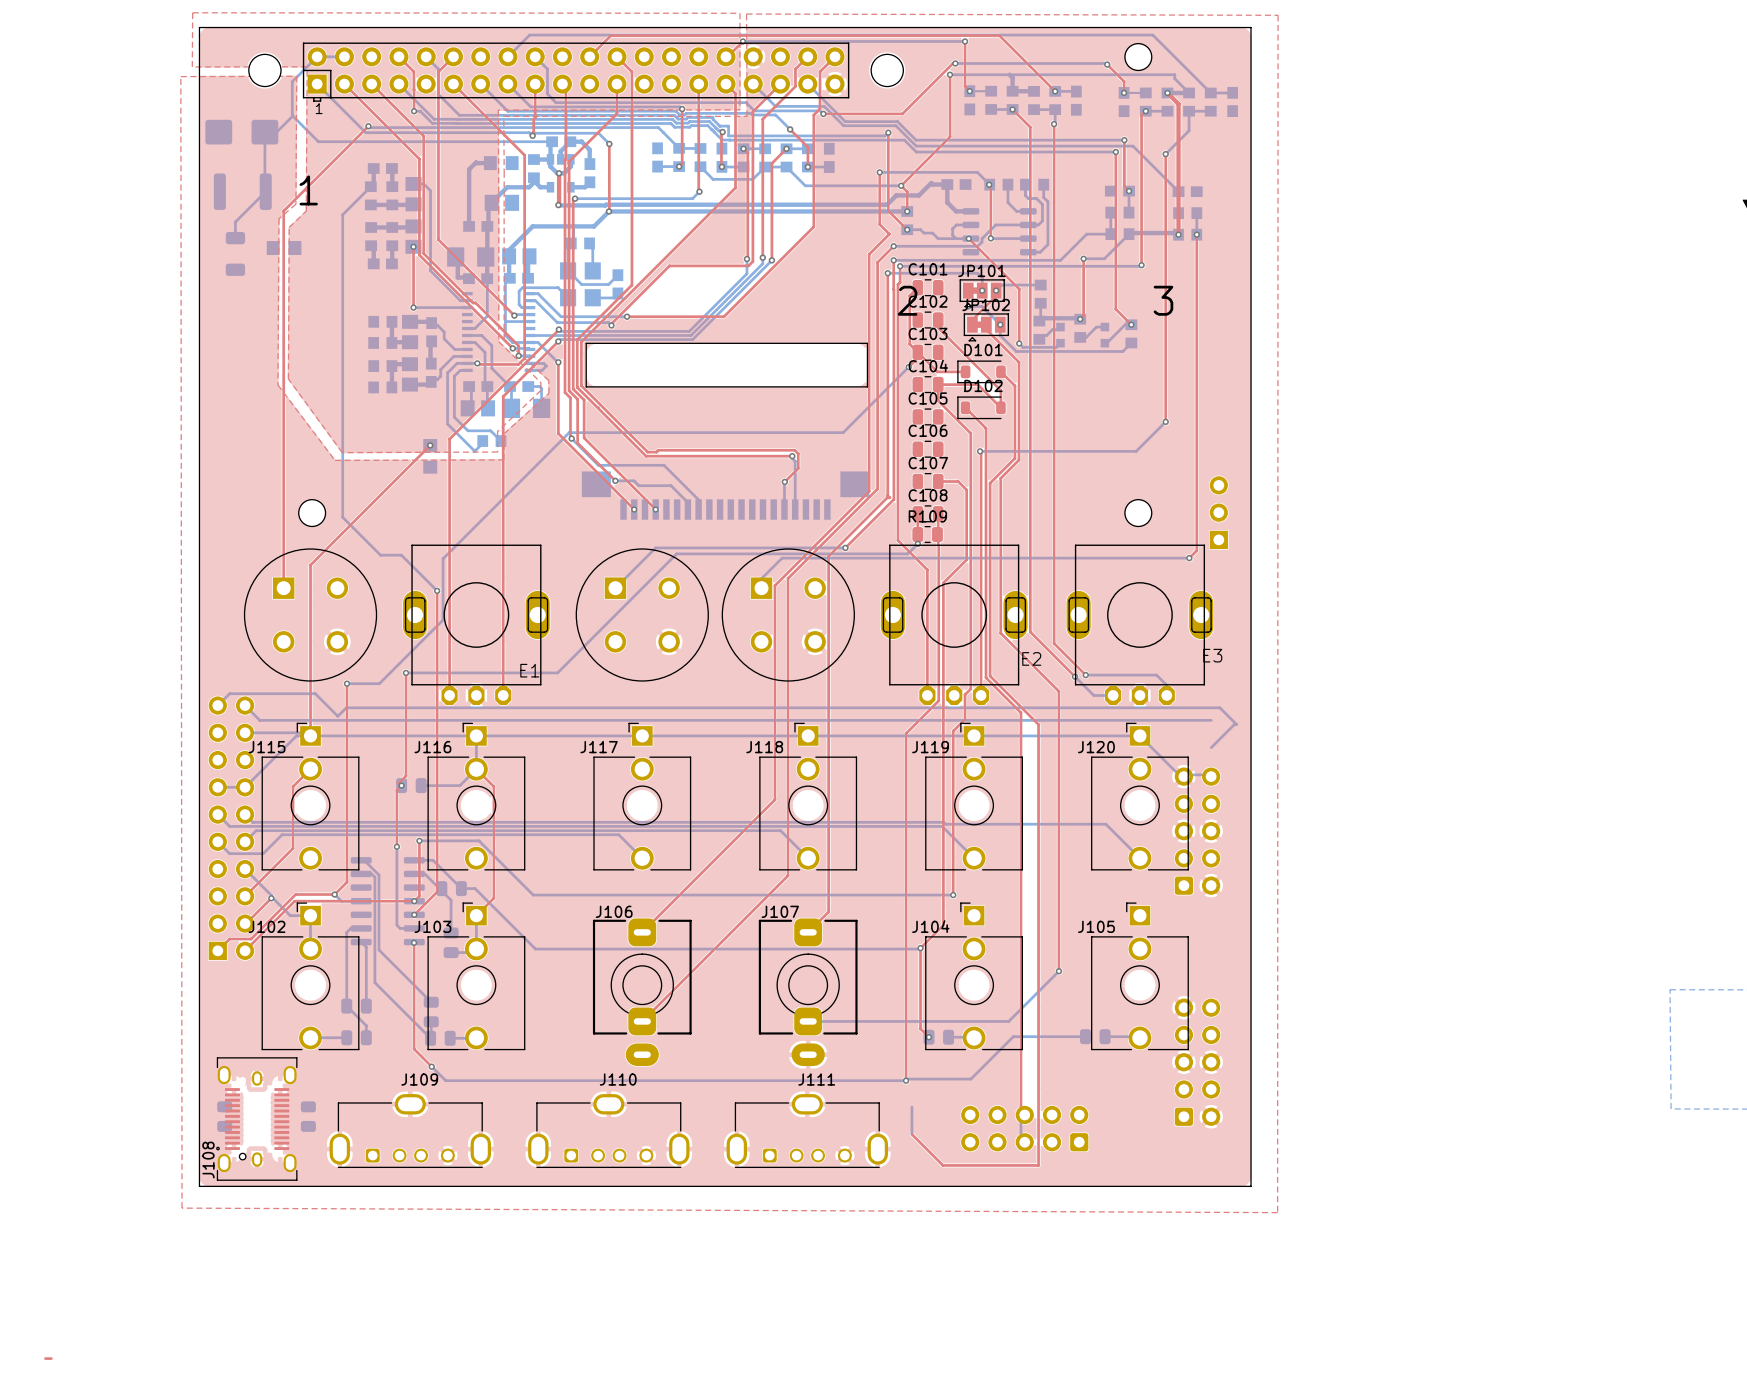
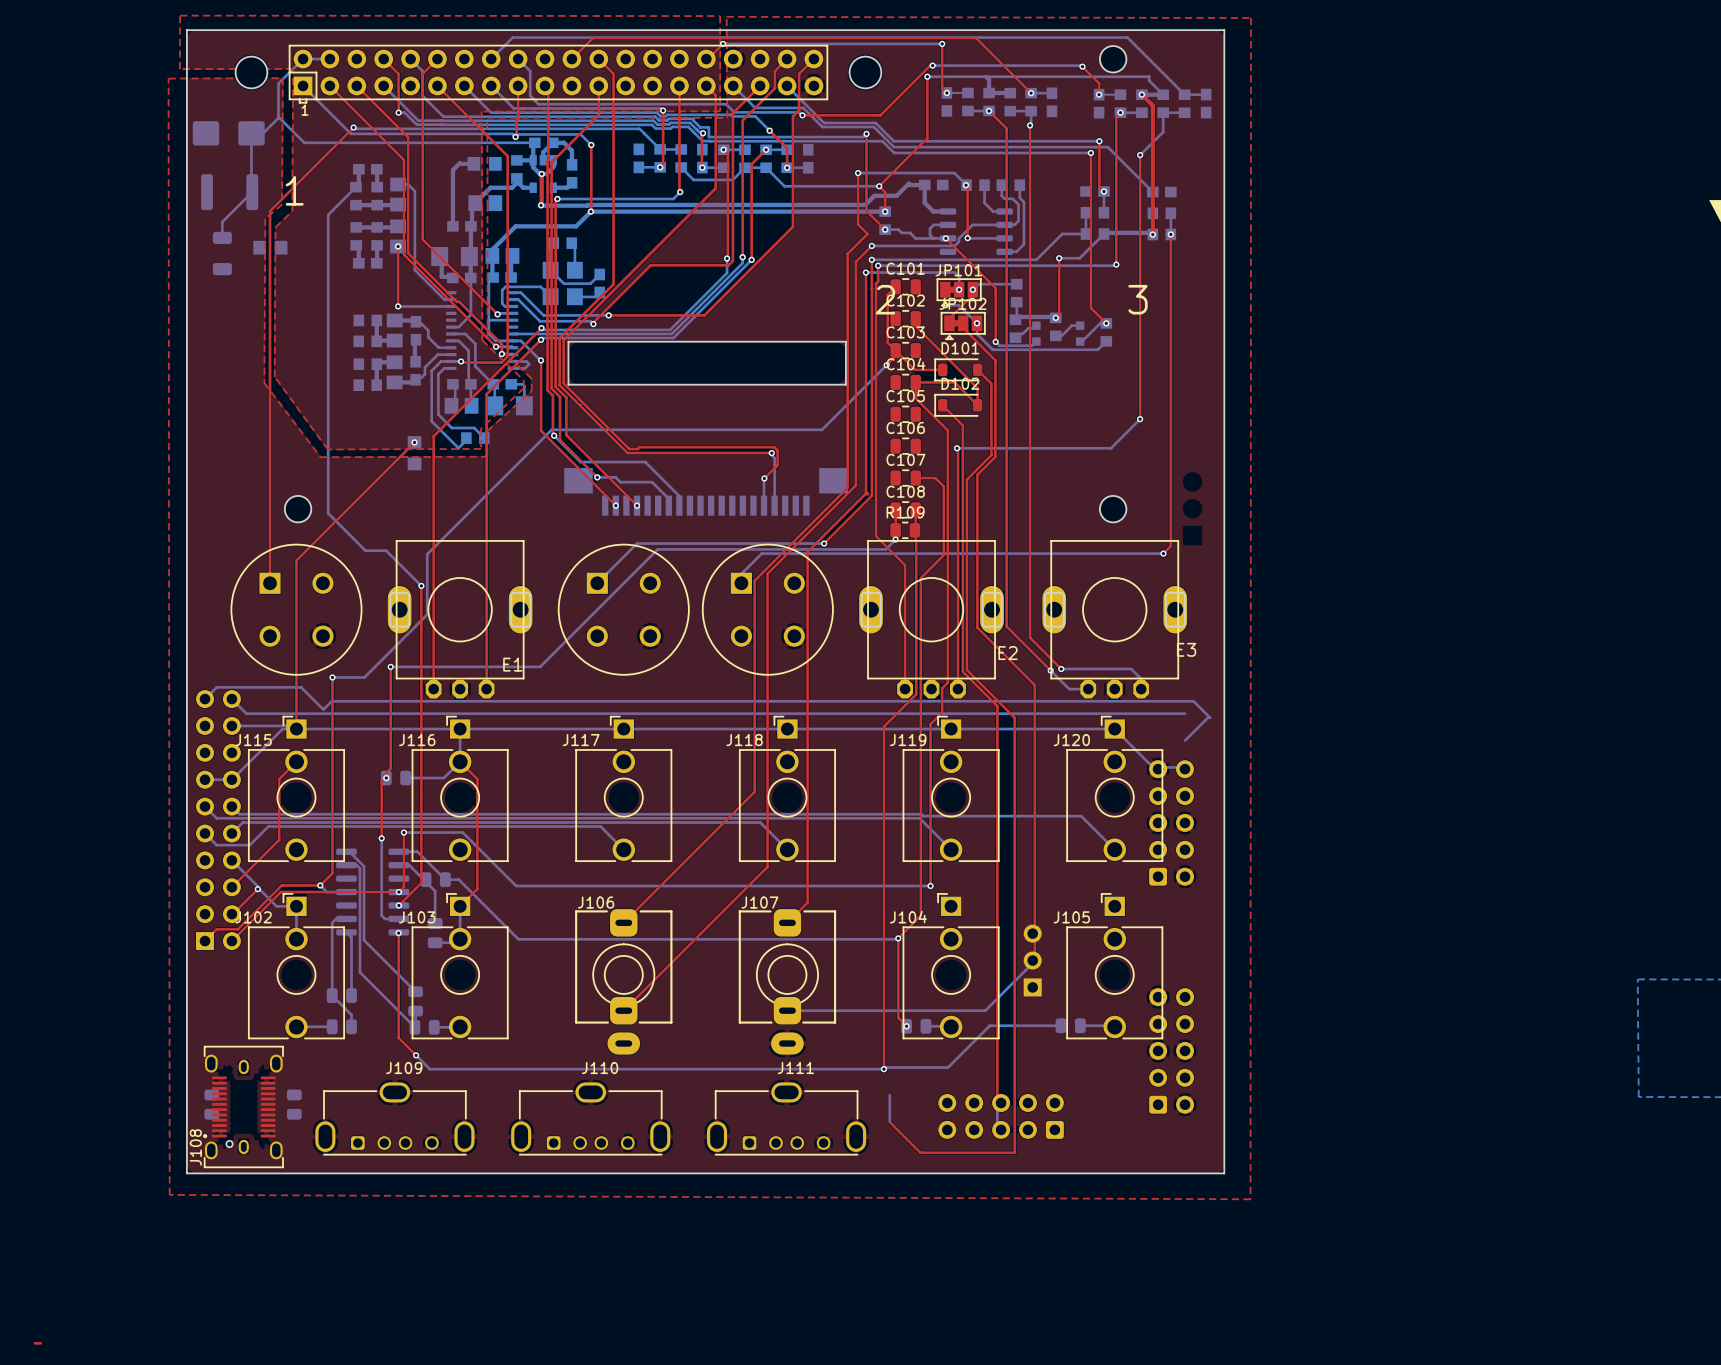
part: (1218, 512) -> none
part: none -> (1032, 960)

